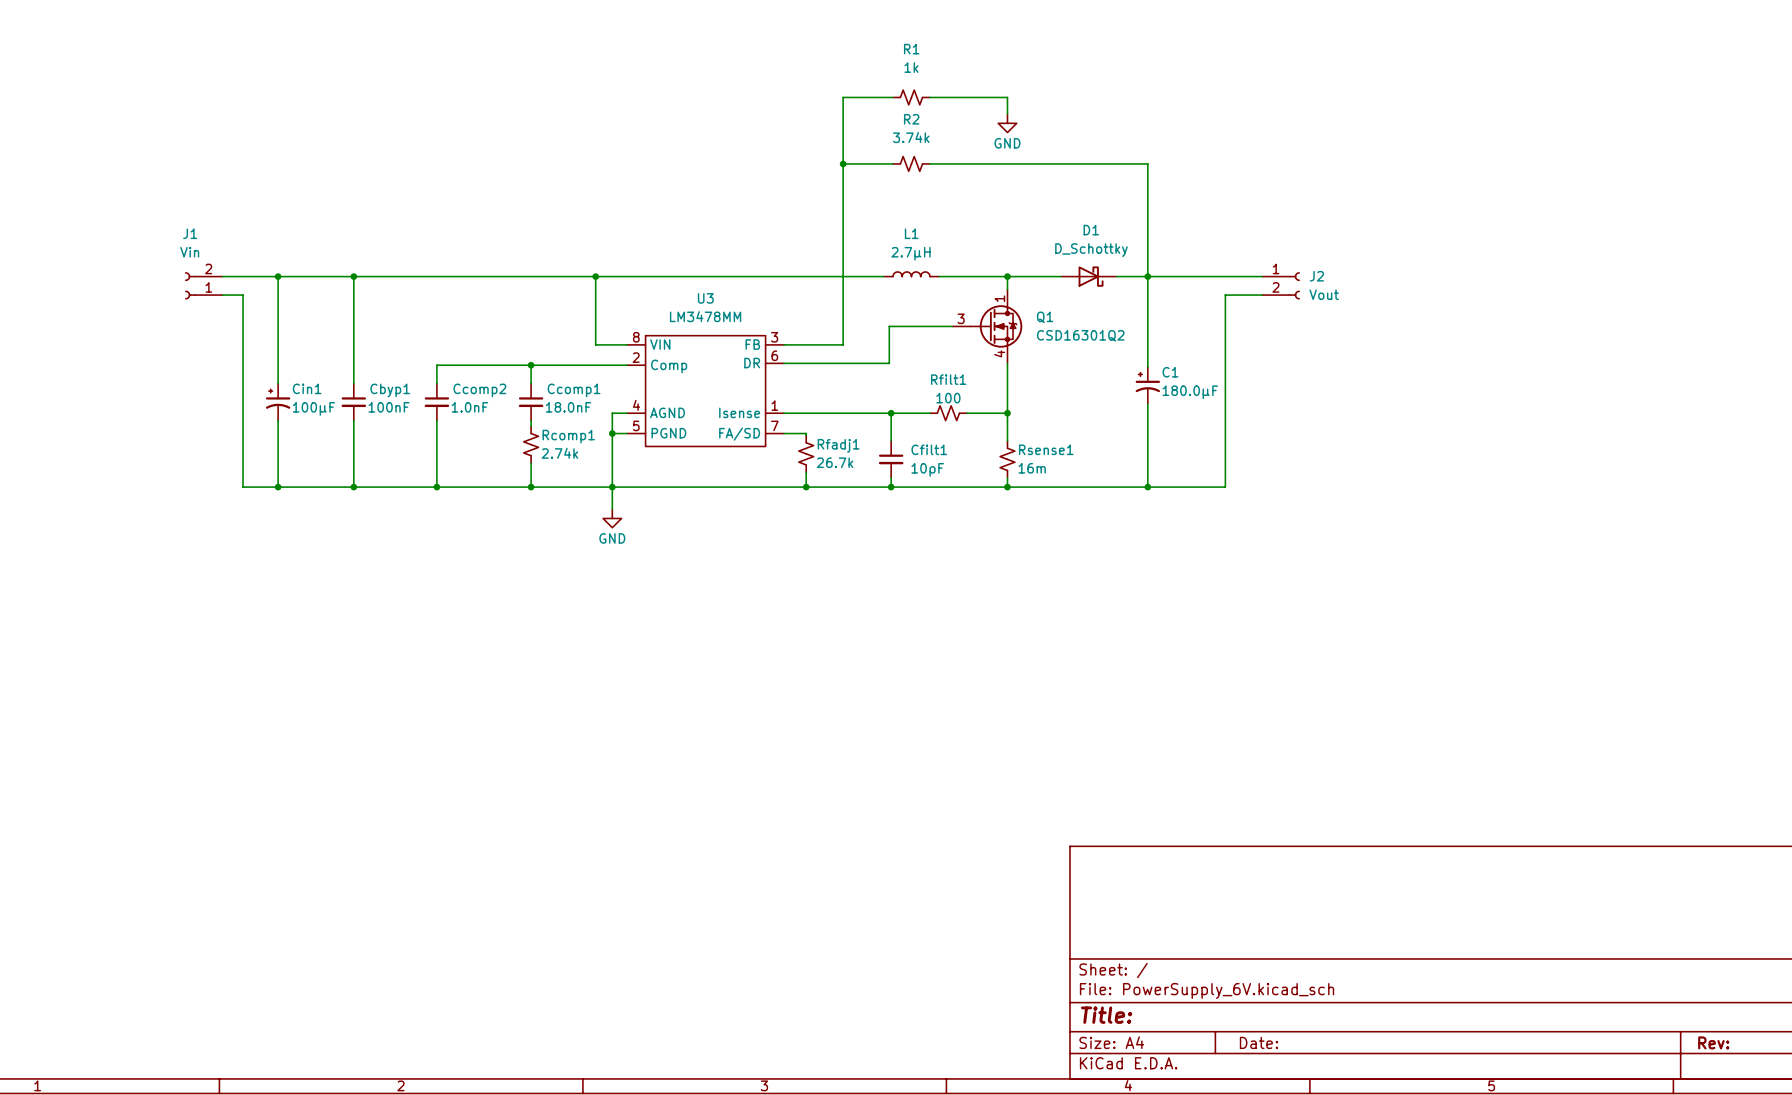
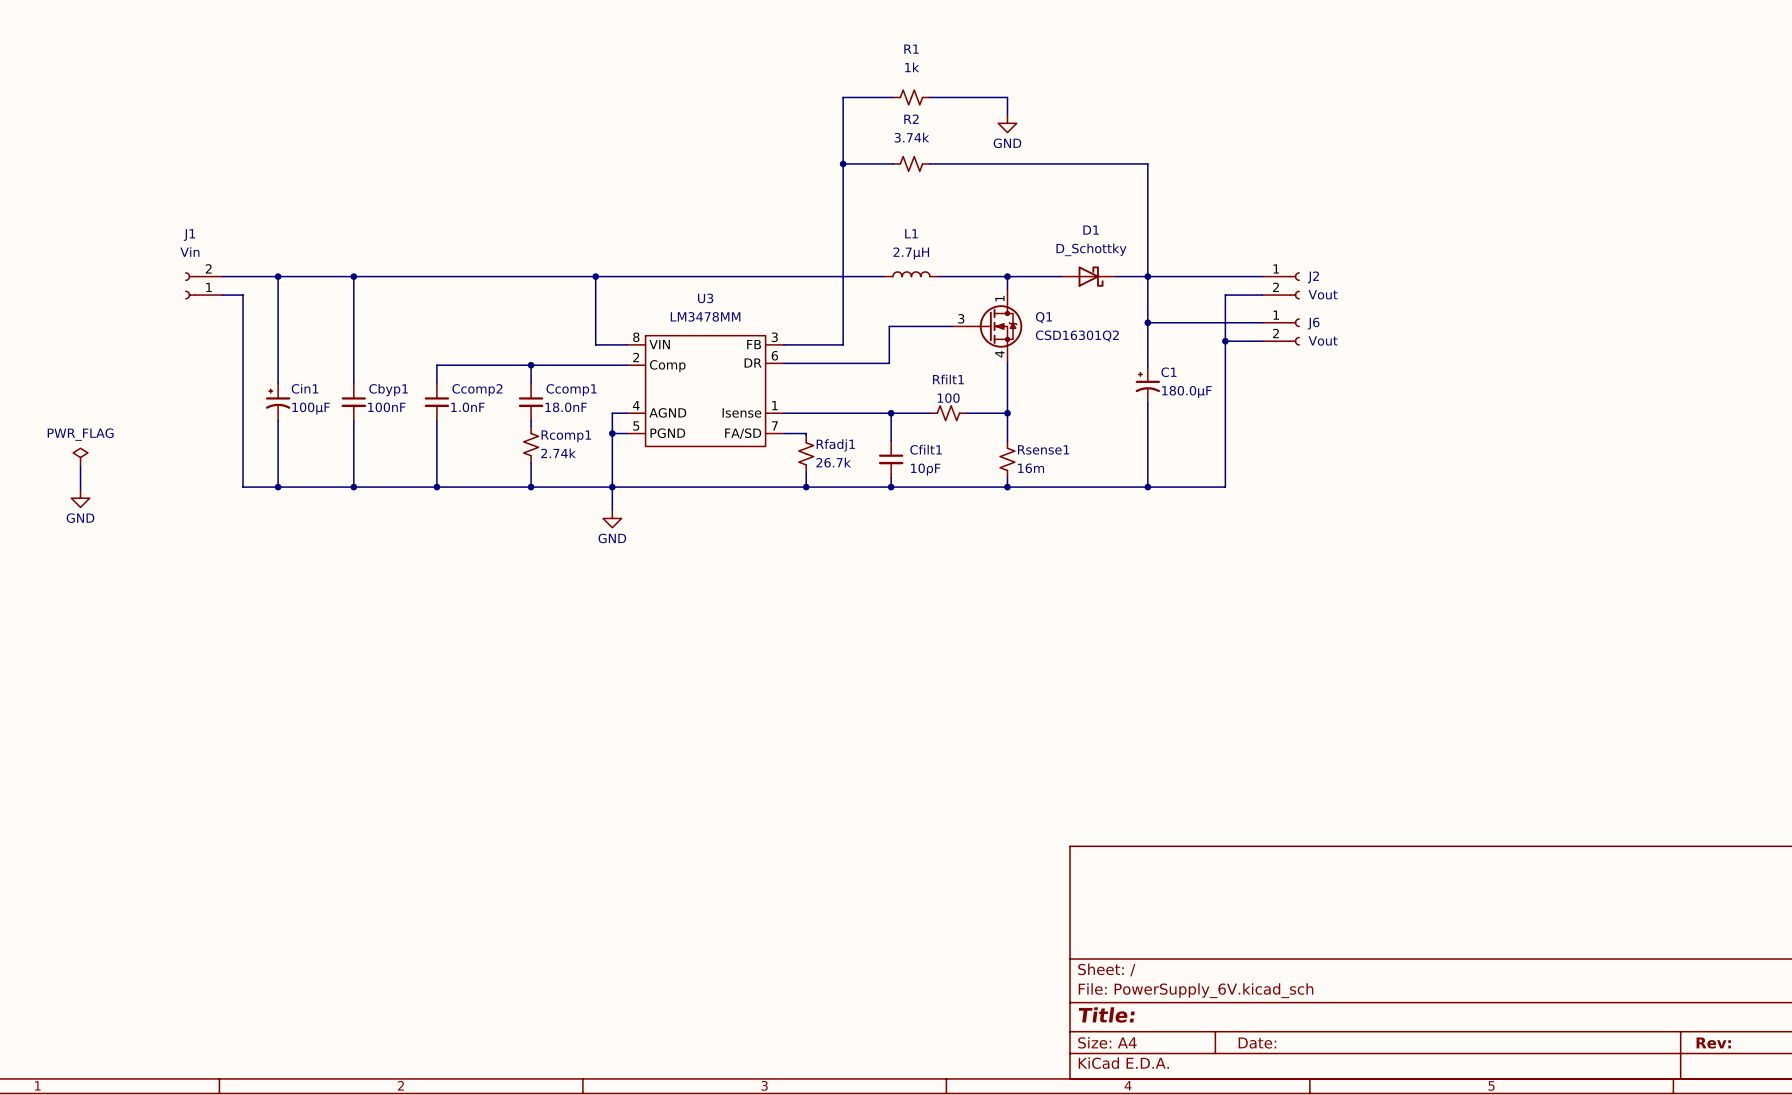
wire: none -> (1147, 322) (1262, 322)
junction: none -> (1147, 322)
J6: none -> Vout (1281, 331)
wire: none -> (1225, 341) (1262, 341)
junction: none -> (1225, 341)
power symbol: none -> PWR_FLAG (80, 457)
wire: none -> (80, 466) (80, 488)
power symbol: none -> GND (80, 498)

